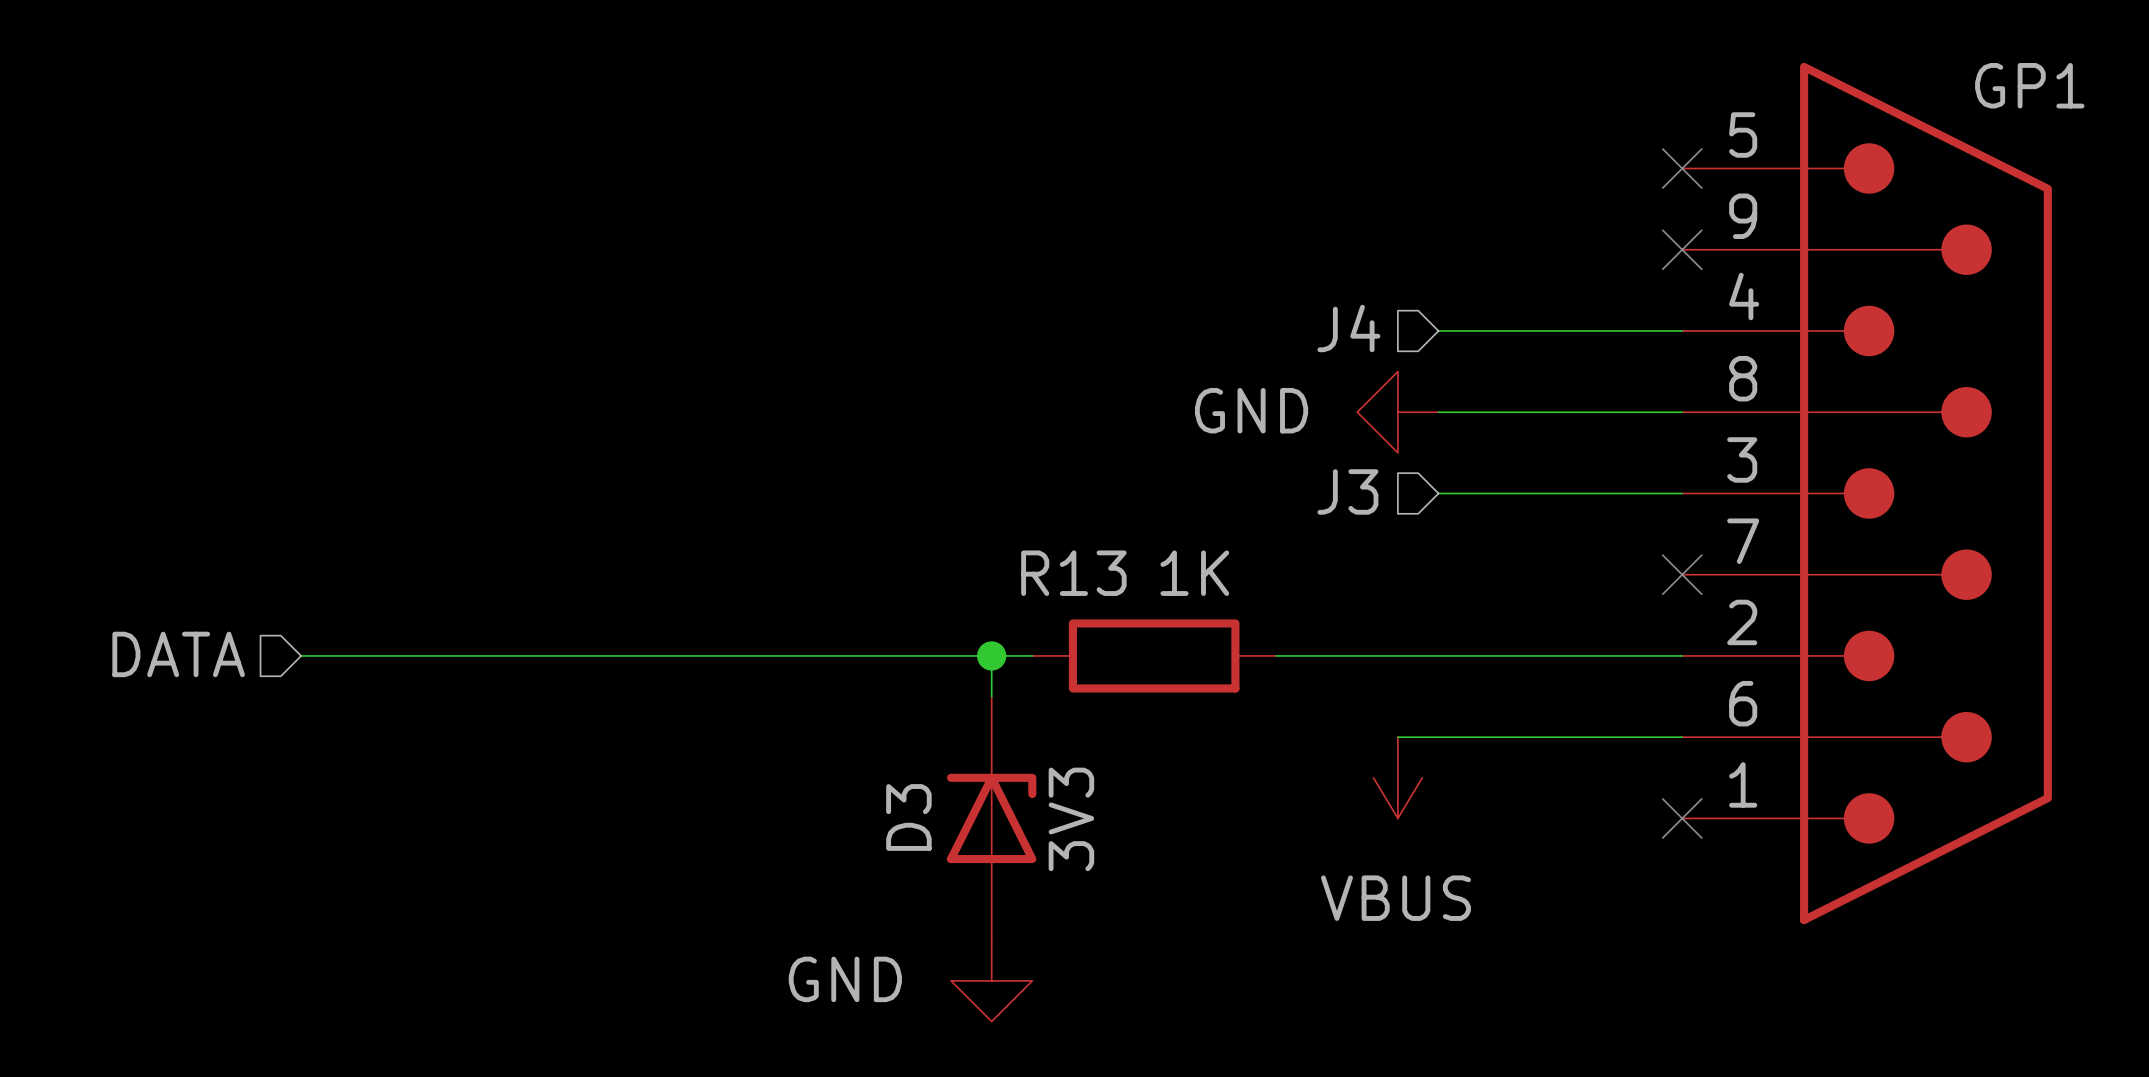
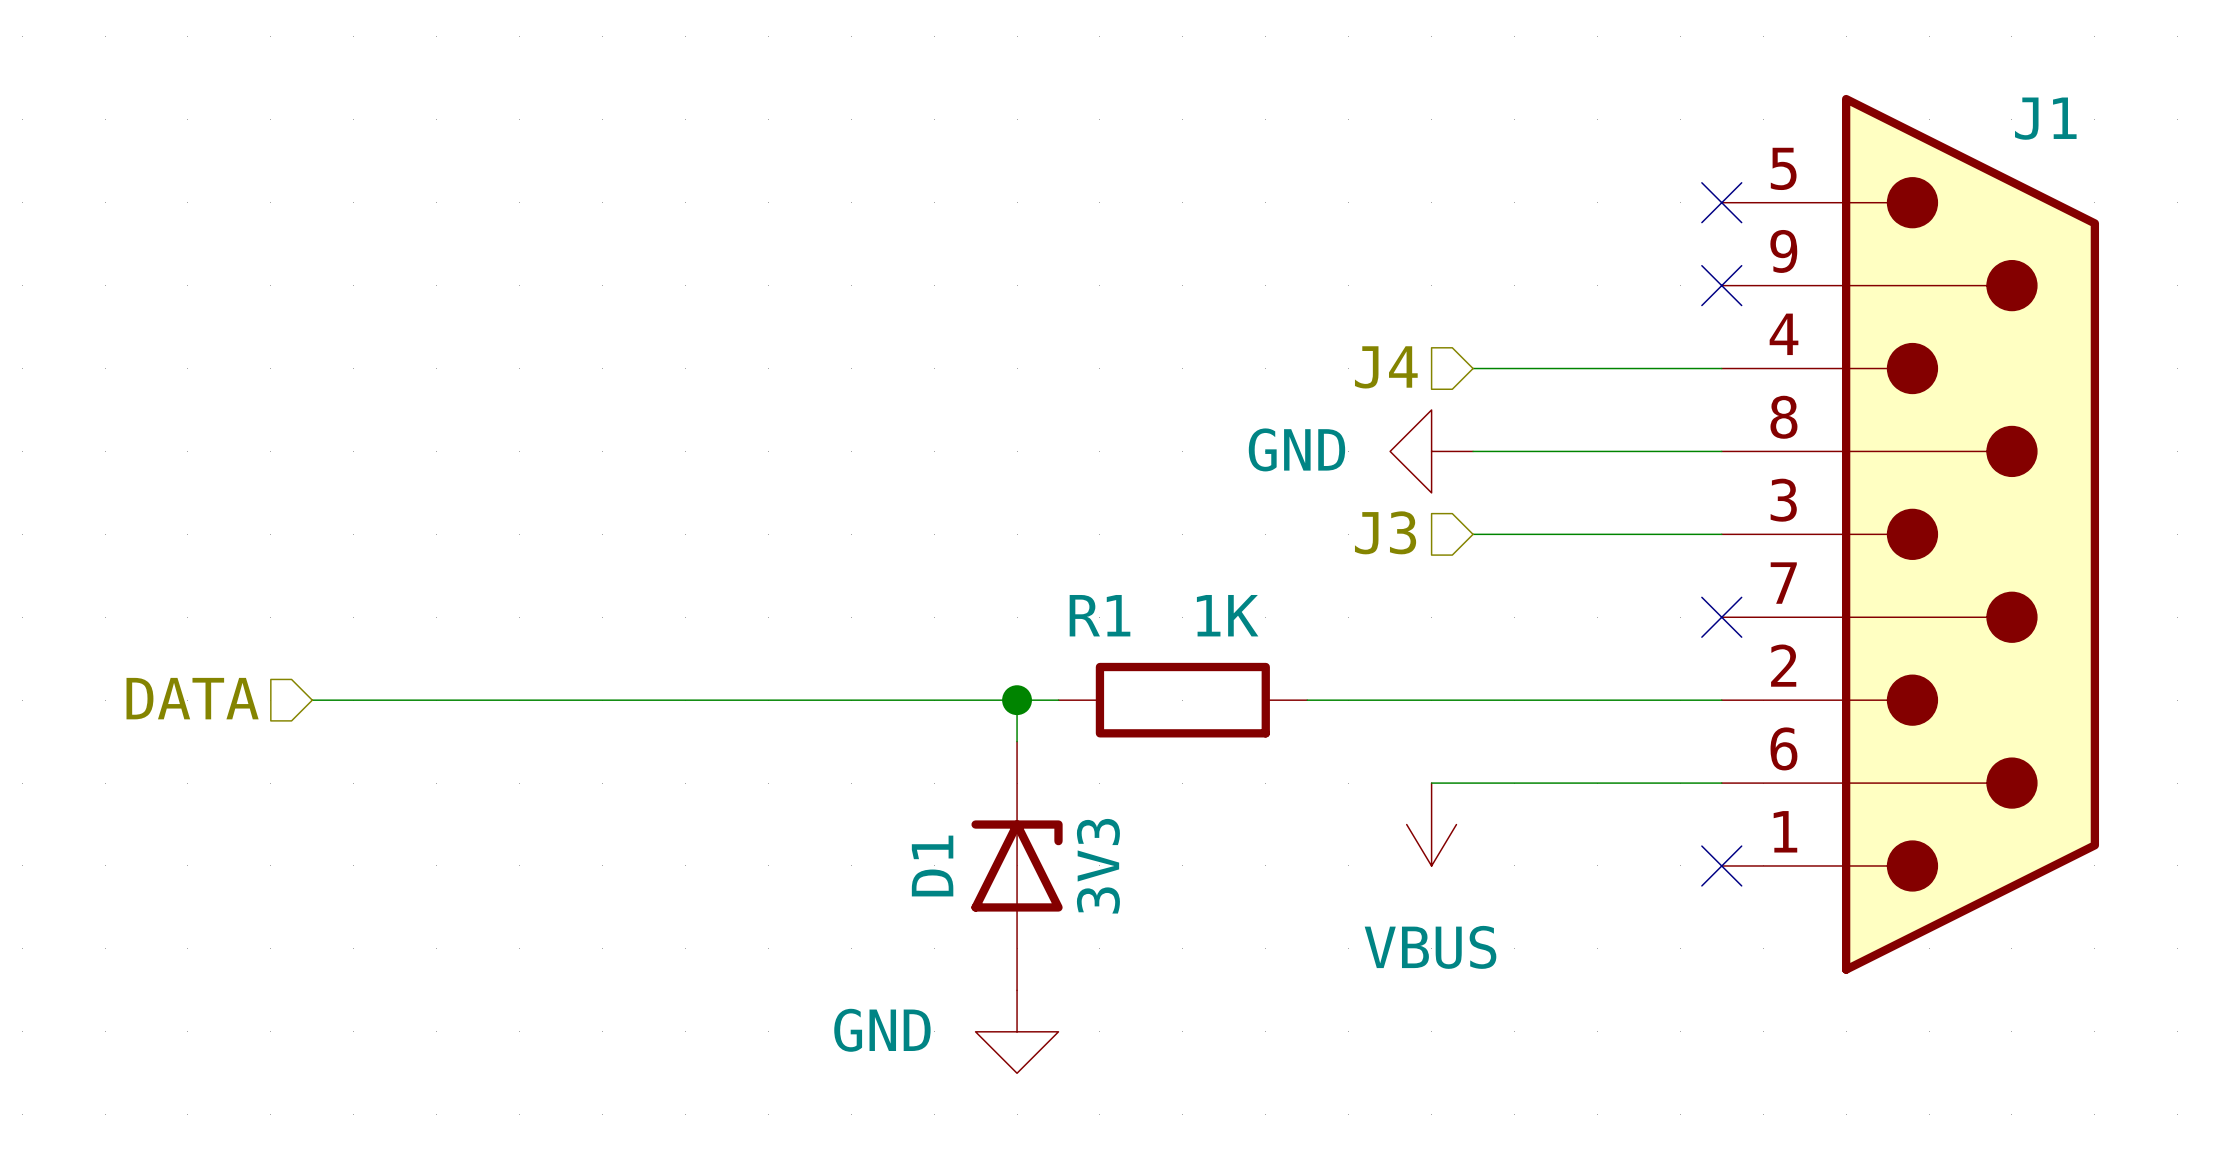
GP1 name: GP1 (2029, 85) -> J1 (2045, 118)
R13 name: R13 (1073, 573) -> R1 (1100, 615)
D3 name: D3 (908, 817) -> D1 (932, 866)

